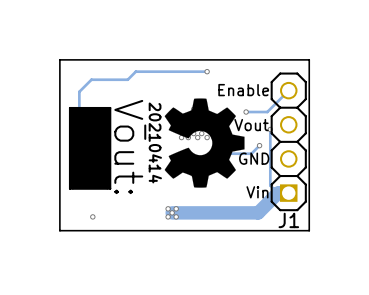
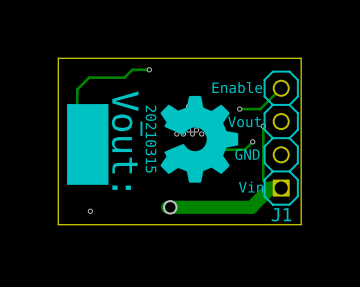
track: (207, 71) (153, 71) -> none
via position: (207, 71) -> (149, 69)
drawing shape: [144, 102, 162, 184] -> [140, 105, 157, 173]
via: (168, 208) -> none
via: (176, 208) -> none
via: (172, 212) -> none
via: none -> (170, 207)
via: (168, 216) -> none
via: (176, 216) -> none

